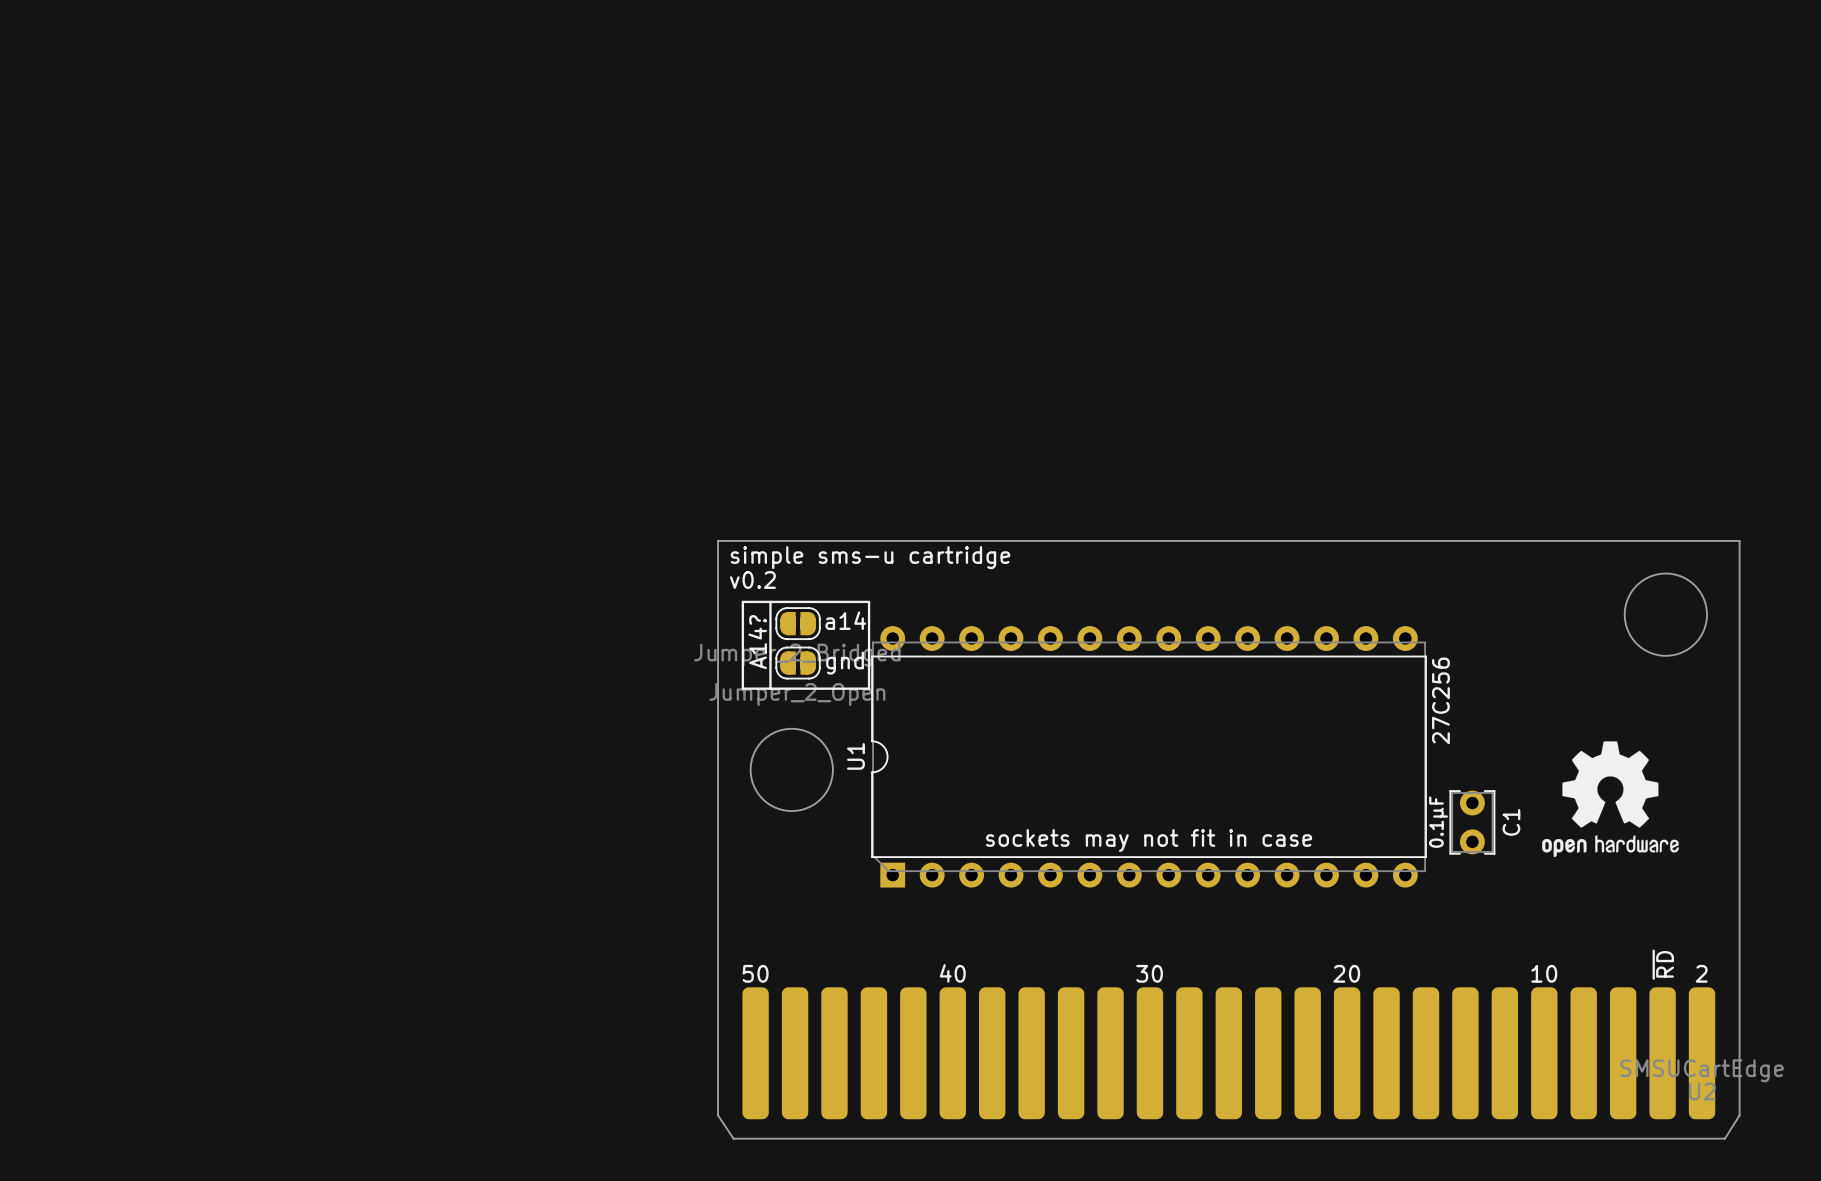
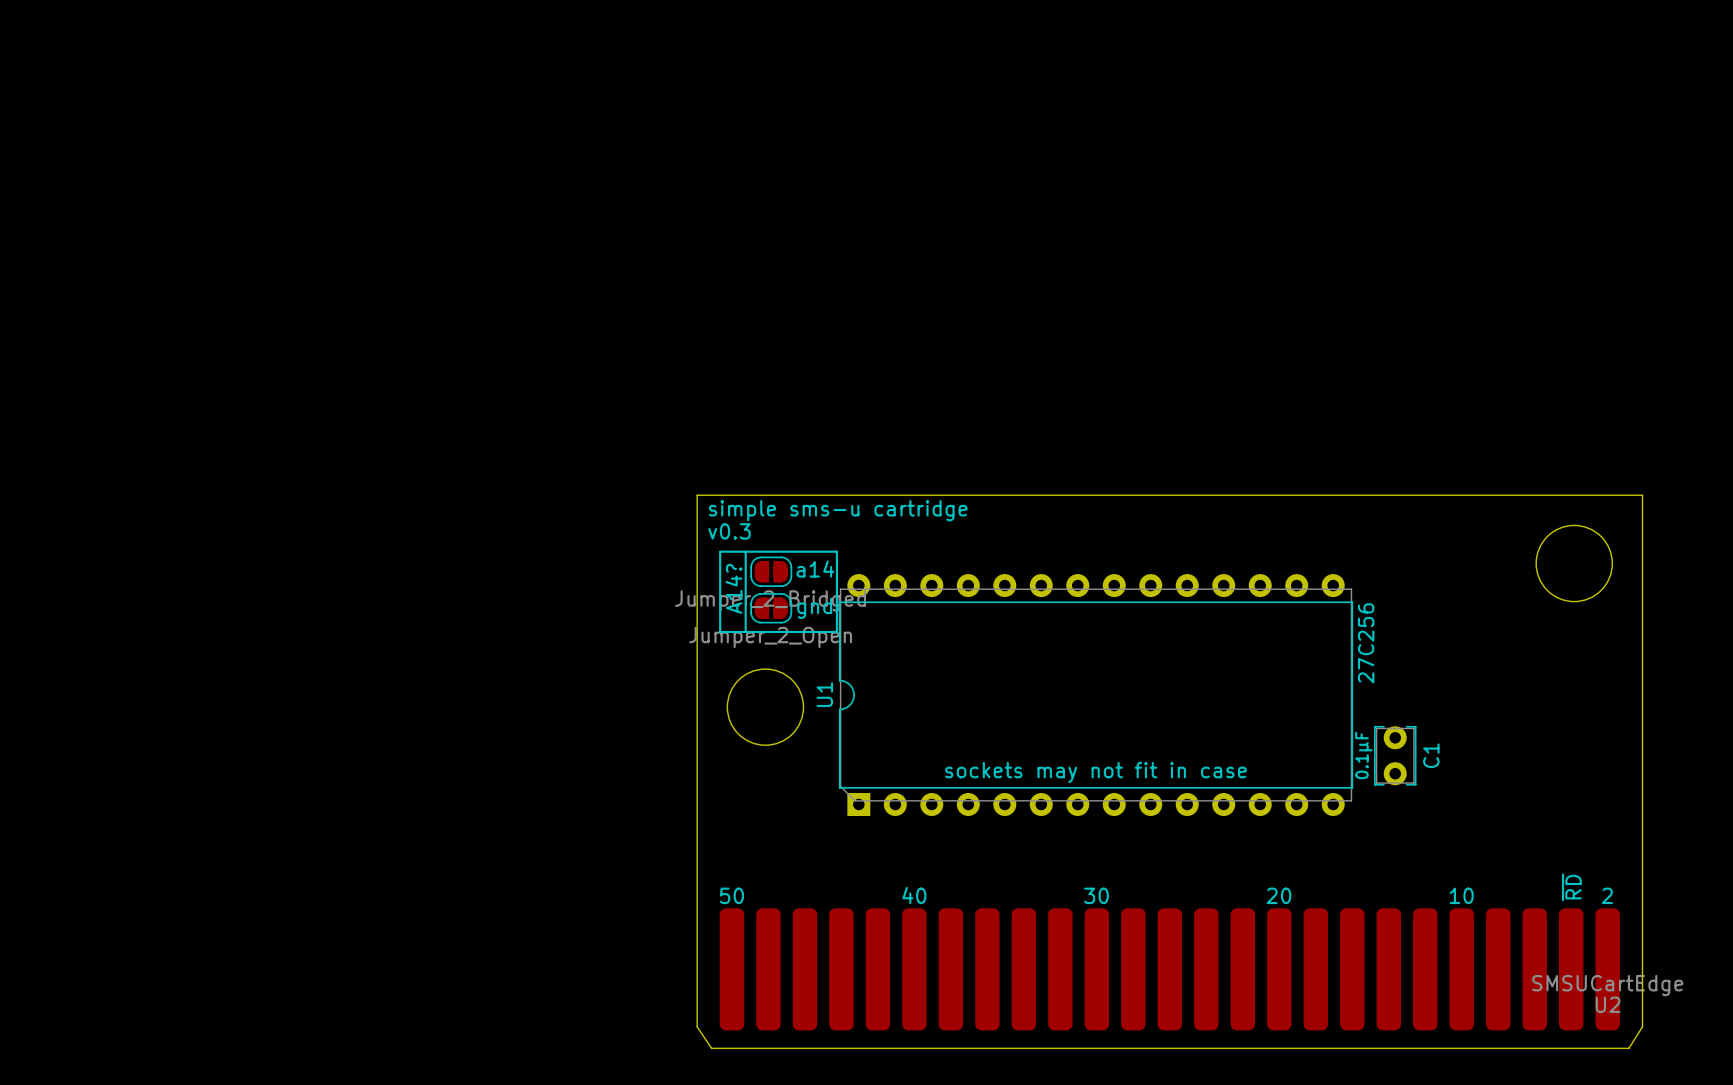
text: v0.2 (752, 580) -> v0.3 (729, 531)
drawing: [1542, 741, 1679, 858] -> none

